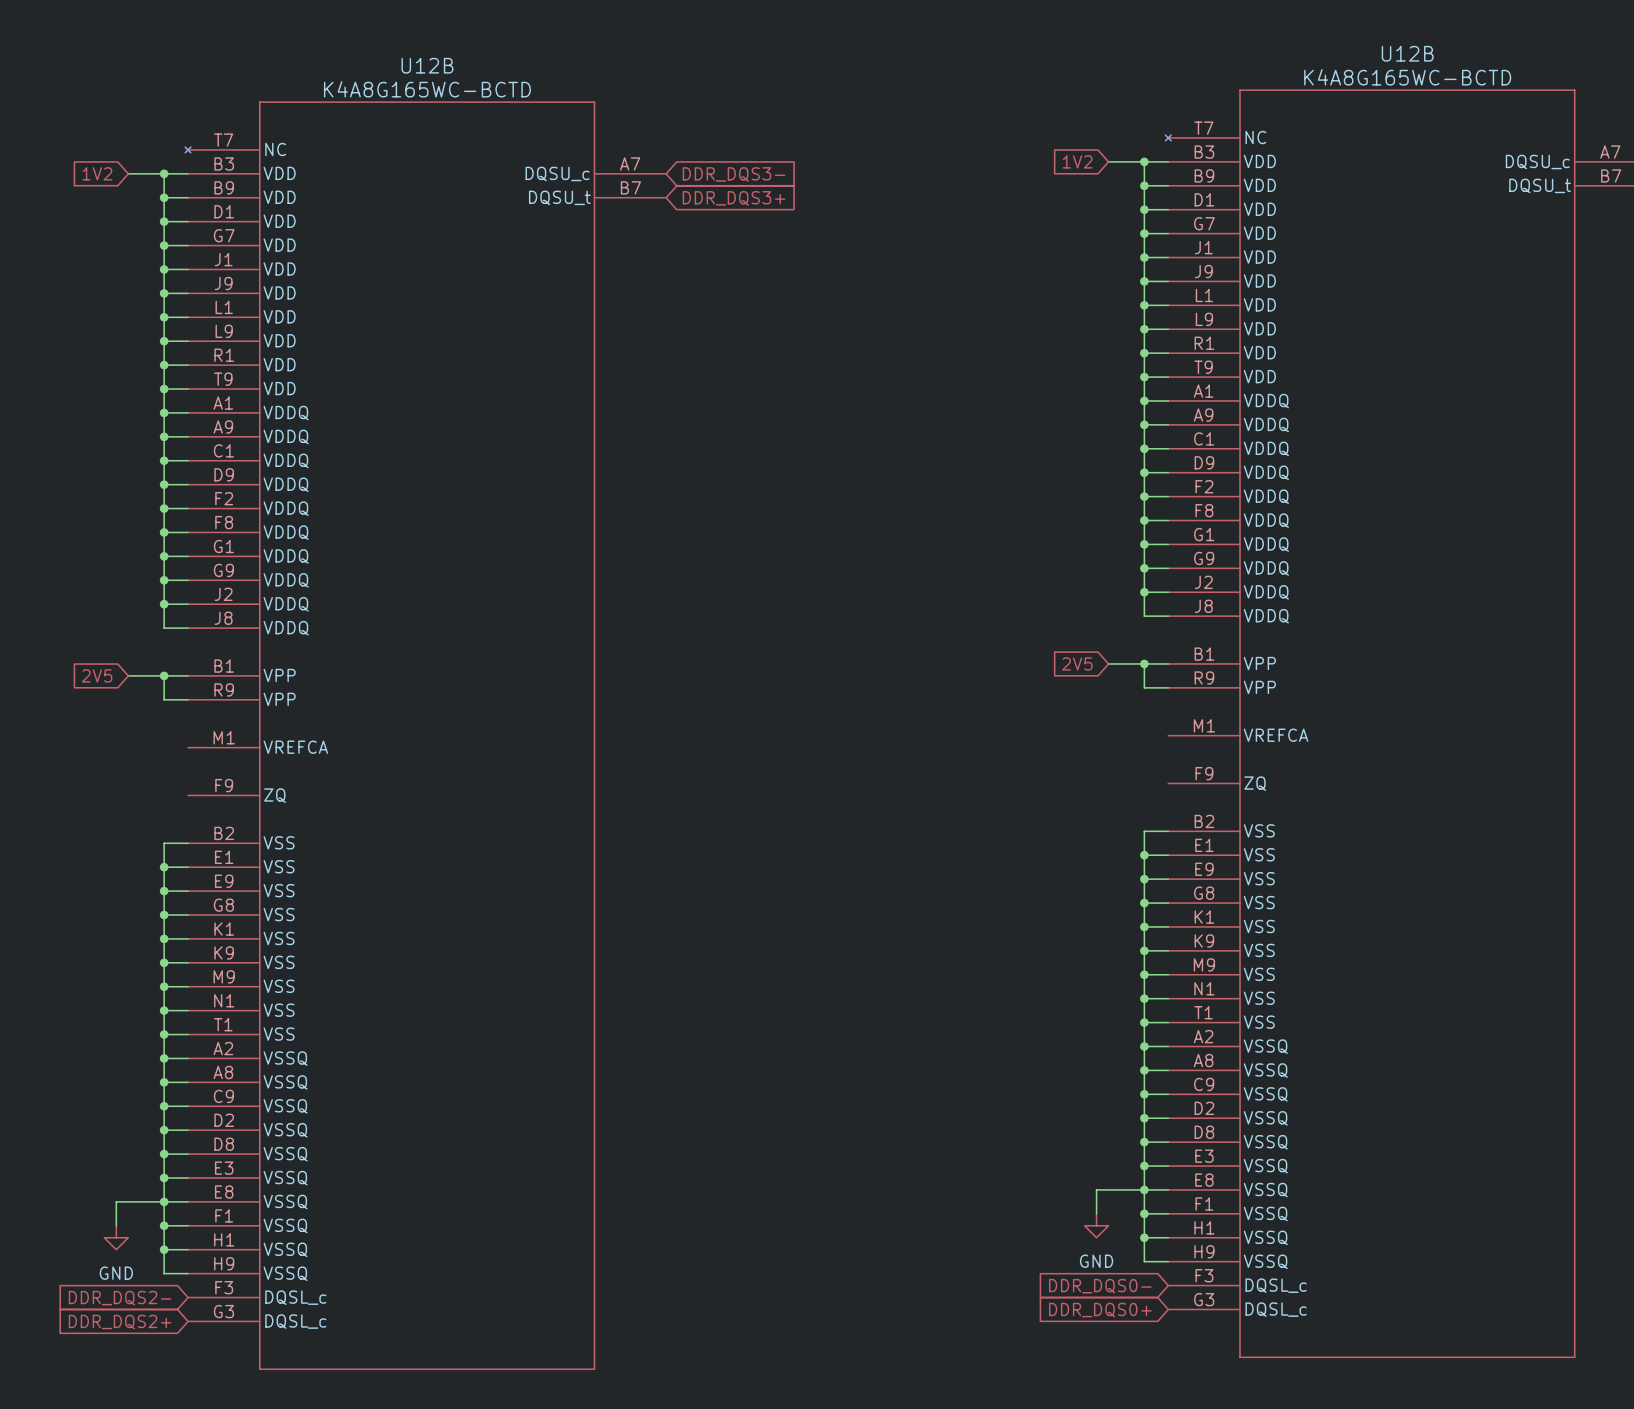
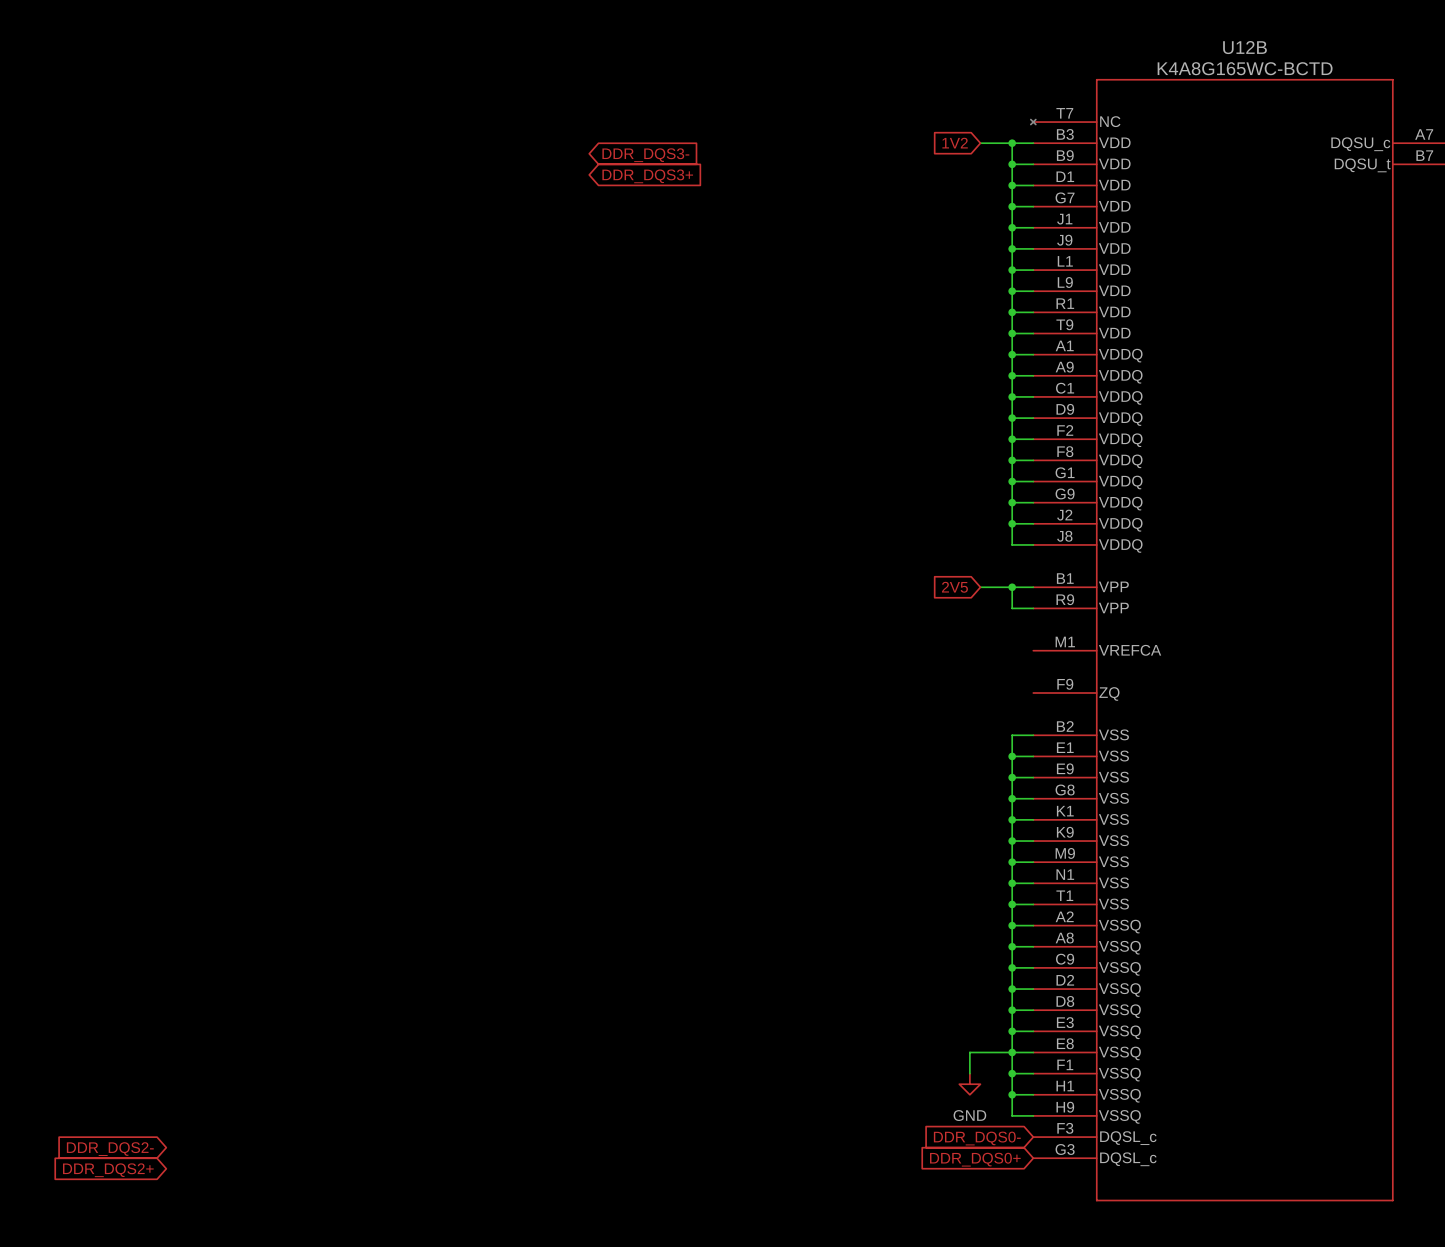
global label: 1V2 (97, 173) -> none
wire: (128, 173) (188, 173) -> none
wire: (164, 173) (164, 628) (188, 628) -> none
junction: (164, 173) -> none
wire: (164, 197) (188, 197) -> none
junction: (164, 197) -> none
wire: (164, 221) (188, 221) -> none
junction: (164, 221) -> none
wire: (164, 245) (188, 245) -> none
junction: (164, 245) -> none
wire: (164, 269) (188, 269) -> none
junction: (164, 269) -> none
wire: (164, 293) (188, 293) -> none
junction: (164, 293) -> none
wire: (164, 317) (188, 317) -> none
junction: (164, 317) -> none
wire: (164, 341) (188, 341) -> none
junction: (164, 341) -> none
wire: (164, 365) (188, 365) -> none
junction: (164, 365) -> none
wire: (164, 389) (188, 389) -> none
junction: (164, 389) -> none
wire: (164, 412) (188, 412) -> none
junction: (164, 412) -> none
wire: (164, 436) (188, 436) -> none
junction: (164, 436) -> none
wire: (164, 460) (188, 460) -> none
junction: (164, 460) -> none
wire: (164, 484) (188, 484) -> none
junction: (164, 484) -> none
wire: (164, 508) (188, 508) -> none
junction: (164, 508) -> none
wire: (164, 532) (188, 532) -> none
junction: (164, 532) -> none
wire: (164, 556) (188, 556) -> none
junction: (164, 556) -> none
wire: (164, 580) (188, 580) -> none
junction: (164, 580) -> none
wire: (164, 604) (188, 604) -> none
junction: (164, 604) -> none
global label: 2V5 (97, 675) -> none
wire: (128, 675) (188, 675) -> none
wire: (164, 675) (164, 699) (188, 699) -> none
junction: (164, 675) -> none
U12B: K4A8G165WC-BCTD (425, 735) -> none
wire: (188, 843) (164, 843) (164, 1273) (188, 1273) -> none
wire: (164, 867) (188, 867) -> none
junction: (164, 867) -> none
wire: (164, 891) (188, 891) -> none
junction: (164, 891) -> none
wire: (164, 915) (188, 915) -> none
junction: (164, 915) -> none
wire: (164, 938) (188, 938) -> none
junction: (164, 938) -> none
wire: (164, 962) (188, 962) -> none
junction: (164, 962) -> none
wire: (164, 986) (188, 986) -> none
junction: (164, 986) -> none
wire: (164, 1010) (188, 1010) -> none
junction: (164, 1010) -> none
wire: (164, 1034) (188, 1034) -> none
junction: (164, 1034) -> none
wire: (164, 1058) (188, 1058) -> none
junction: (164, 1058) -> none
wire: (164, 1082) (188, 1082) -> none
junction: (164, 1082) -> none
wire: (164, 1106) (188, 1106) -> none
junction: (164, 1106) -> none
wire: (164, 1130) (188, 1130) -> none
junction: (164, 1130) -> none
wire: (164, 1154) (188, 1154) -> none
junction: (164, 1154) -> none
wire: (164, 1177) (188, 1177) -> none
junction: (164, 1177) -> none
junction: (164, 1201) -> none
wire: (188, 1201) (116, 1201) (116, 1225) -> none
wire: (164, 1225) (188, 1225) -> none
junction: (164, 1225) -> none
power symbol: GND (116, 1237) -> none
wire: (164, 1249) (188, 1249) -> none
junction: (164, 1249) -> none

